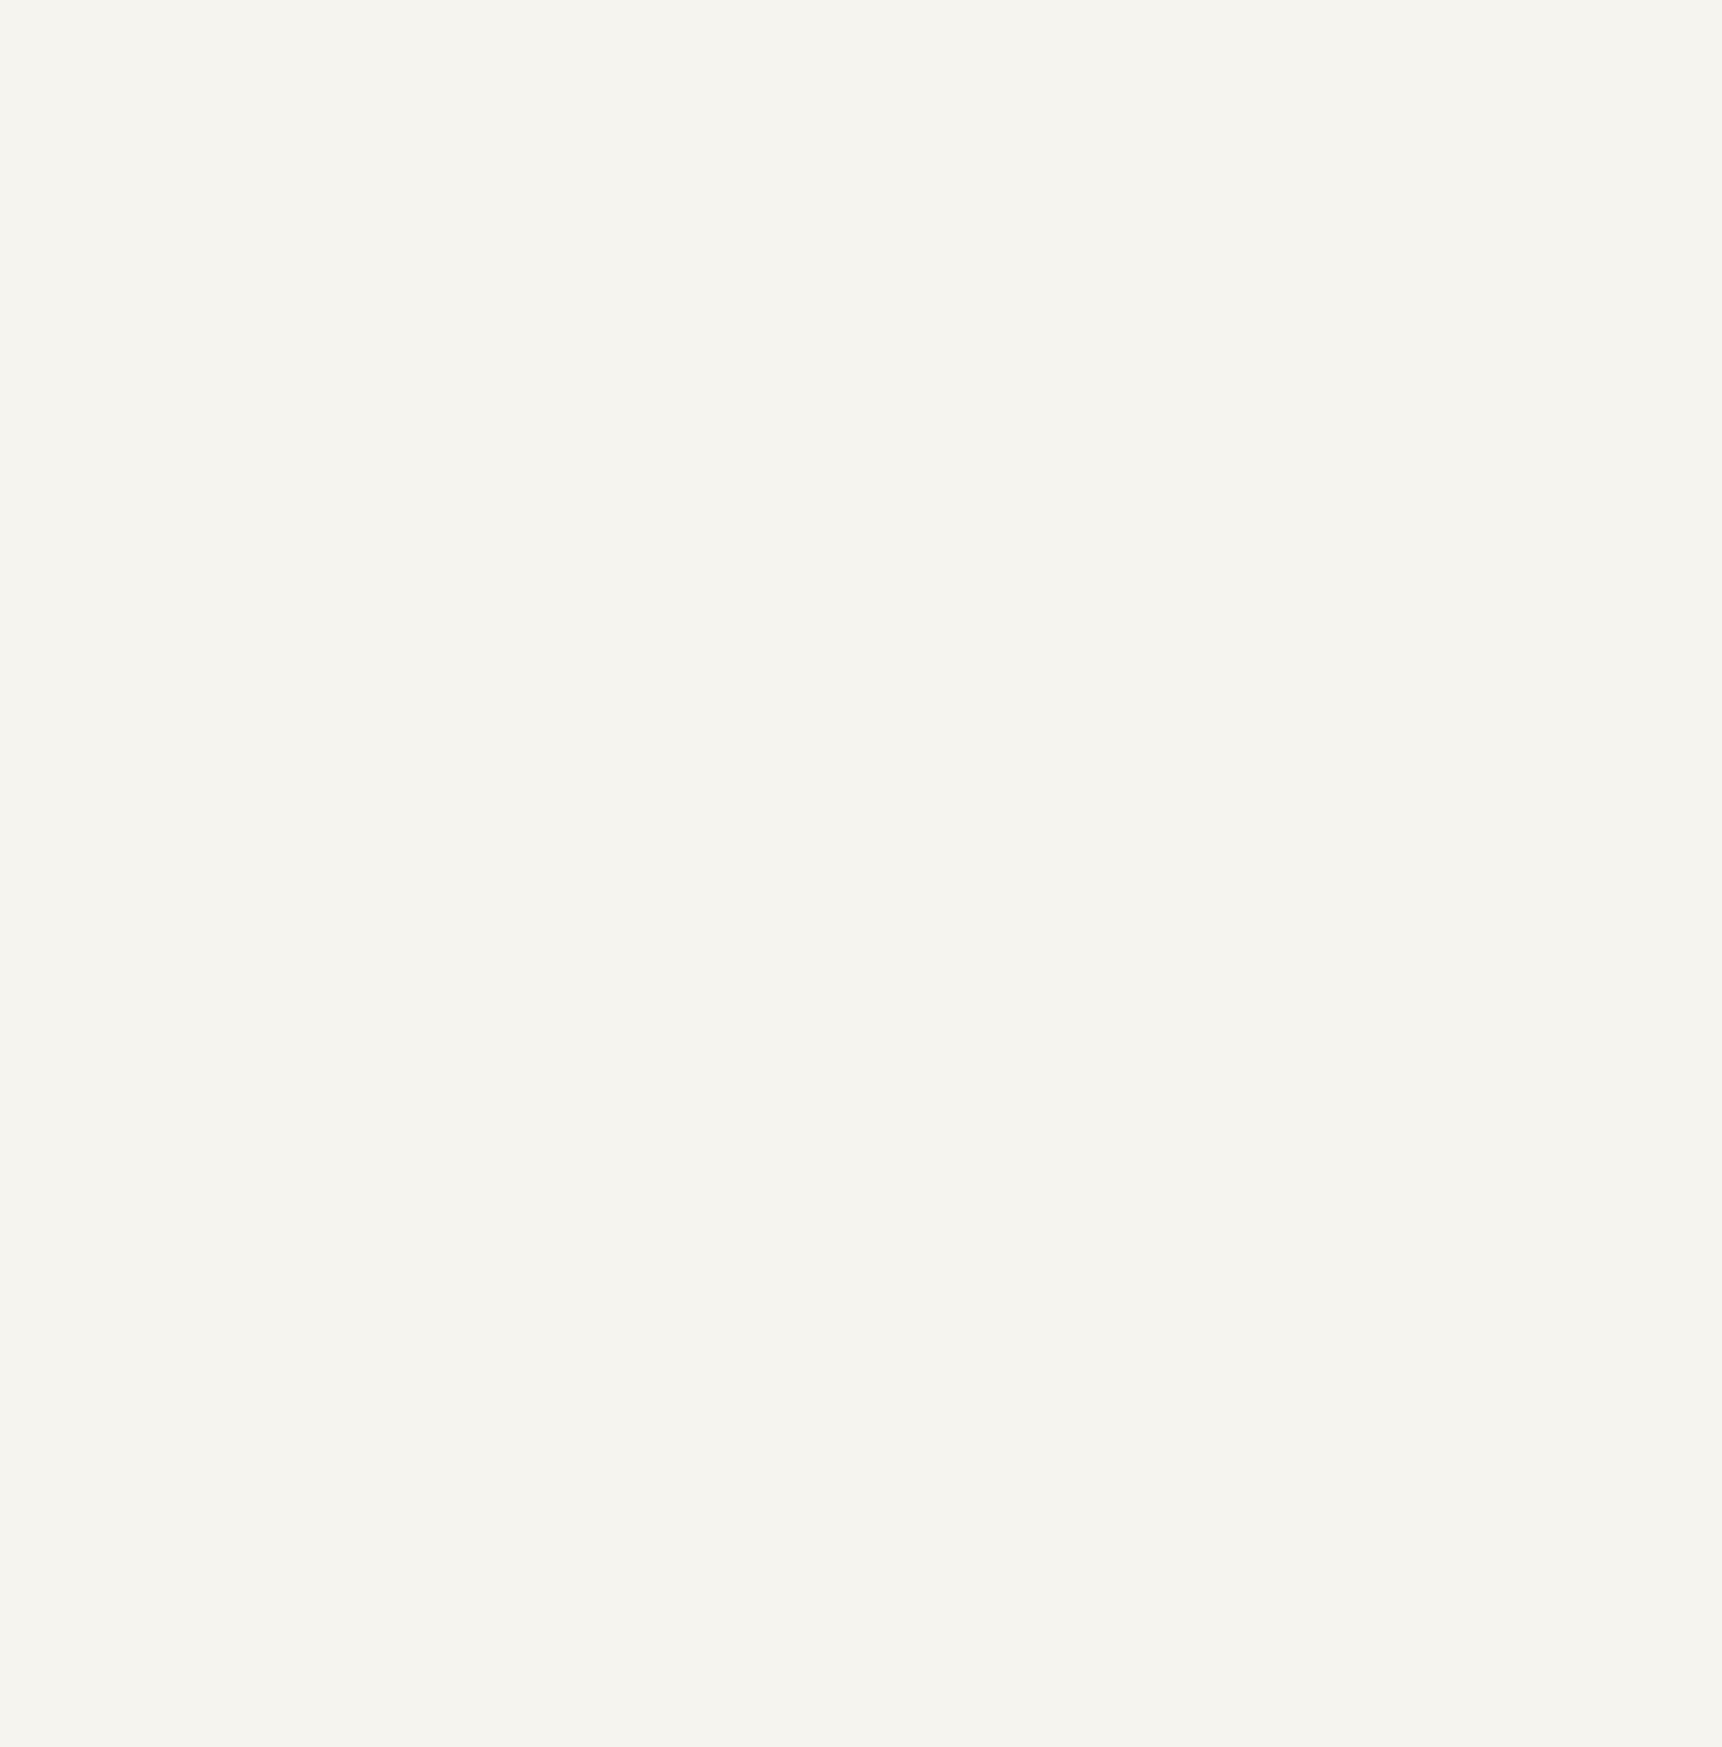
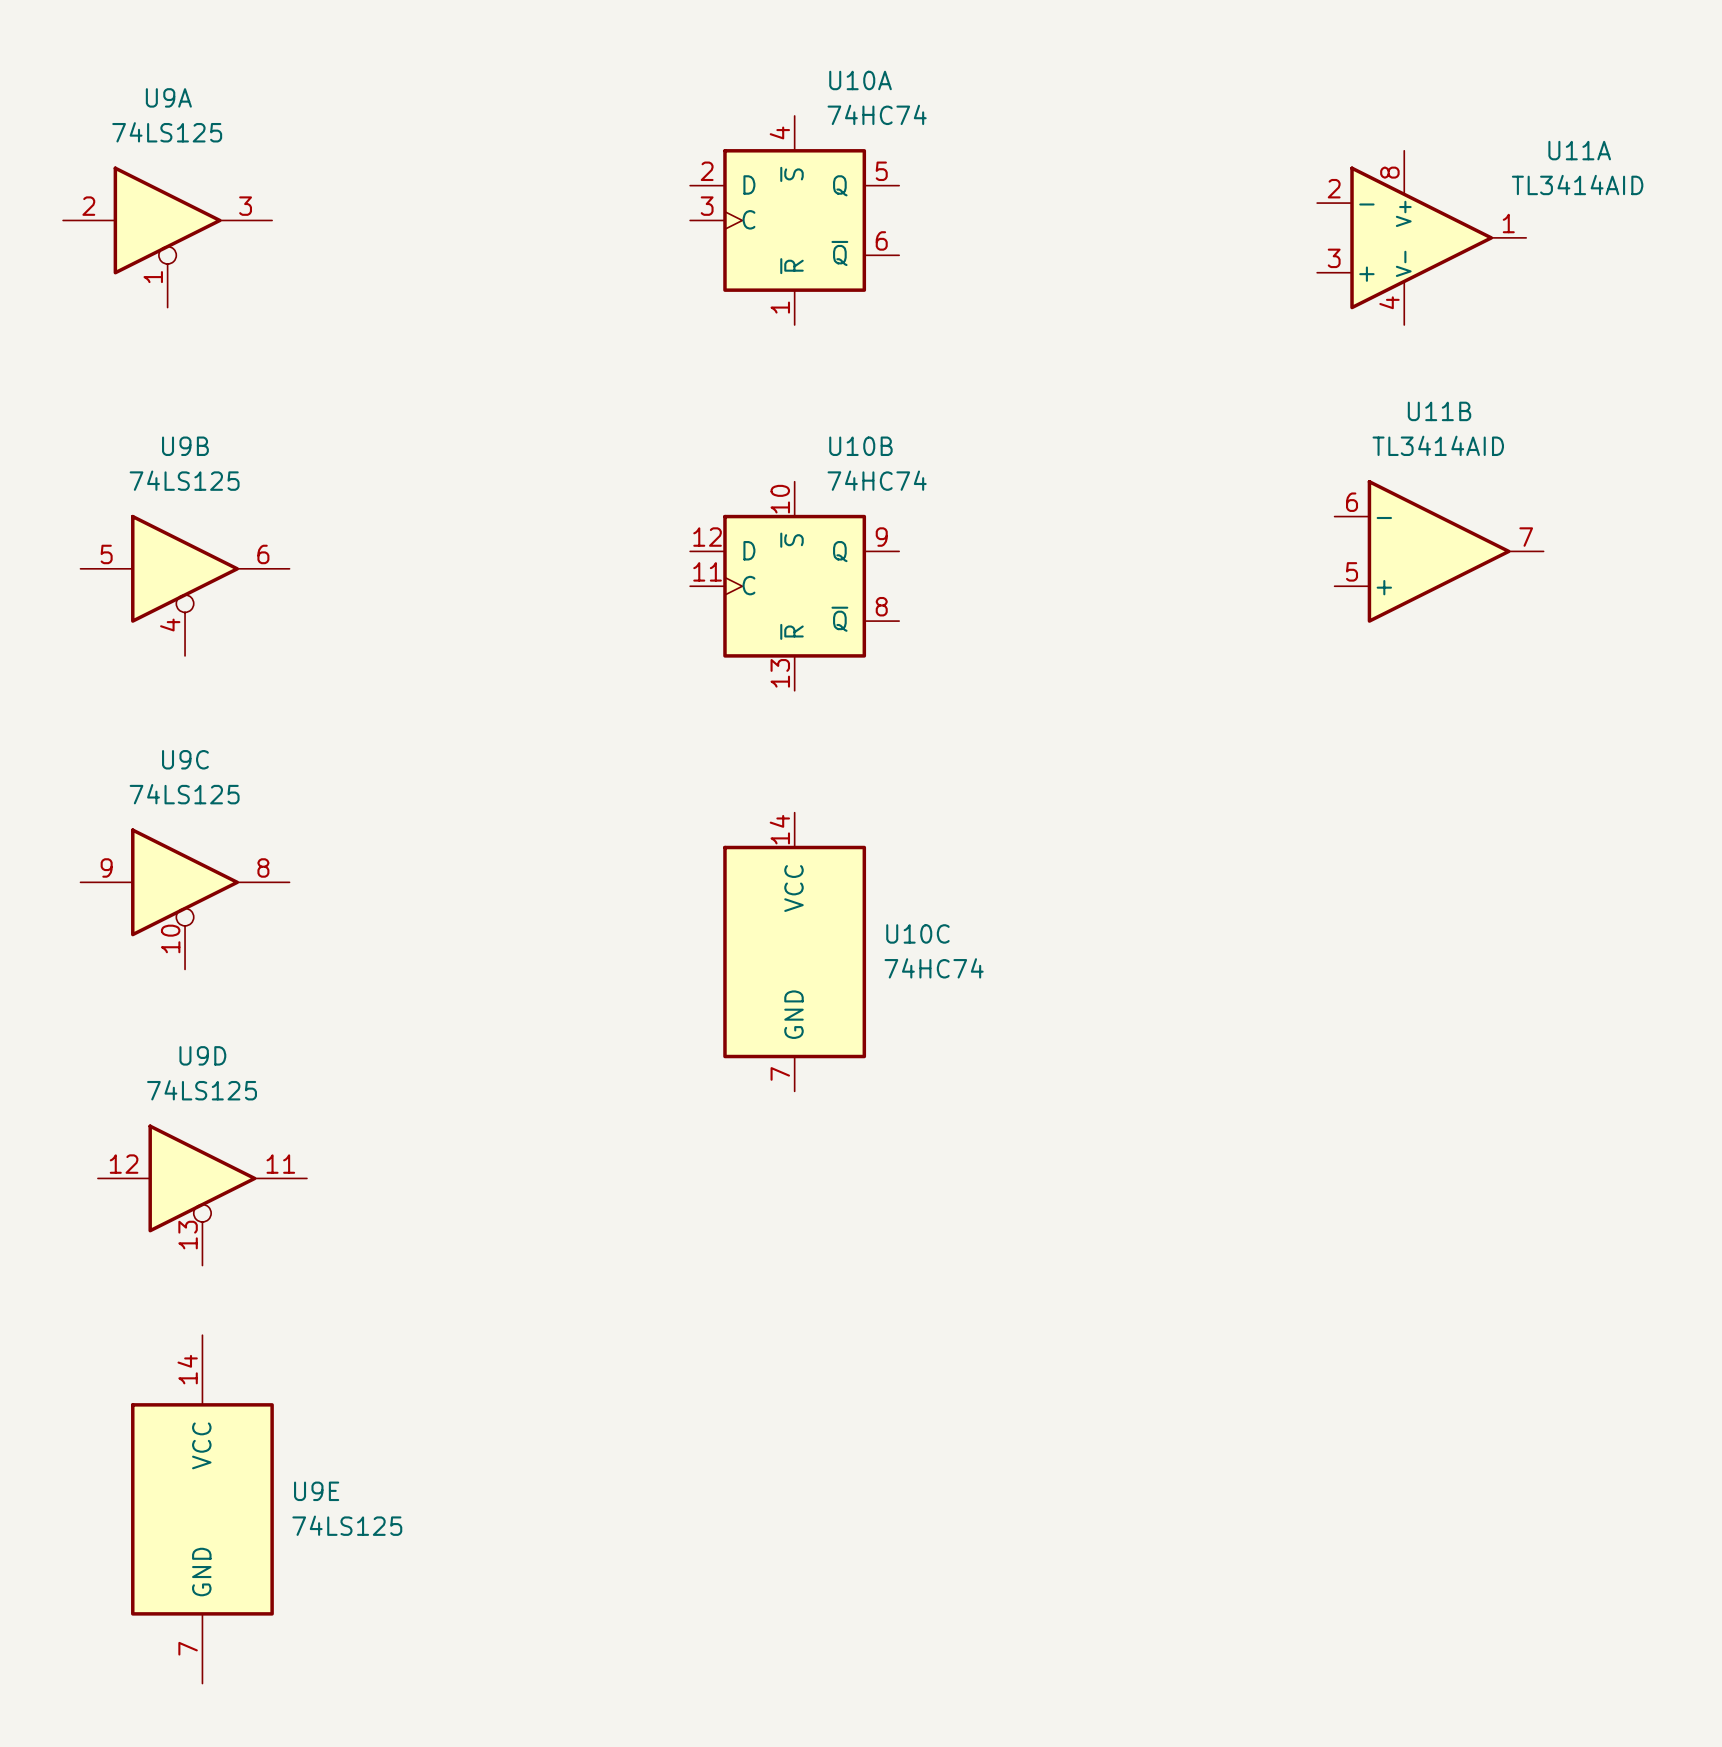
U10A: none -> 74HC74 (794, 220)
U9A: none -> 74LS125 (167, 237)
U11A: none -> TL3414AID (1421, 237)
U11B: none -> TL3414AID (1439, 551)
U9B: none -> 74LS125 (185, 585)
U10B: none -> 74HC74 (794, 586)
U9C: none -> 74LS125 (185, 898)
U10C: none -> 74HC74 (794, 952)
U9D: none -> 74LS125 (202, 1194)
U9E: none -> 74LS125 (202, 1509)

